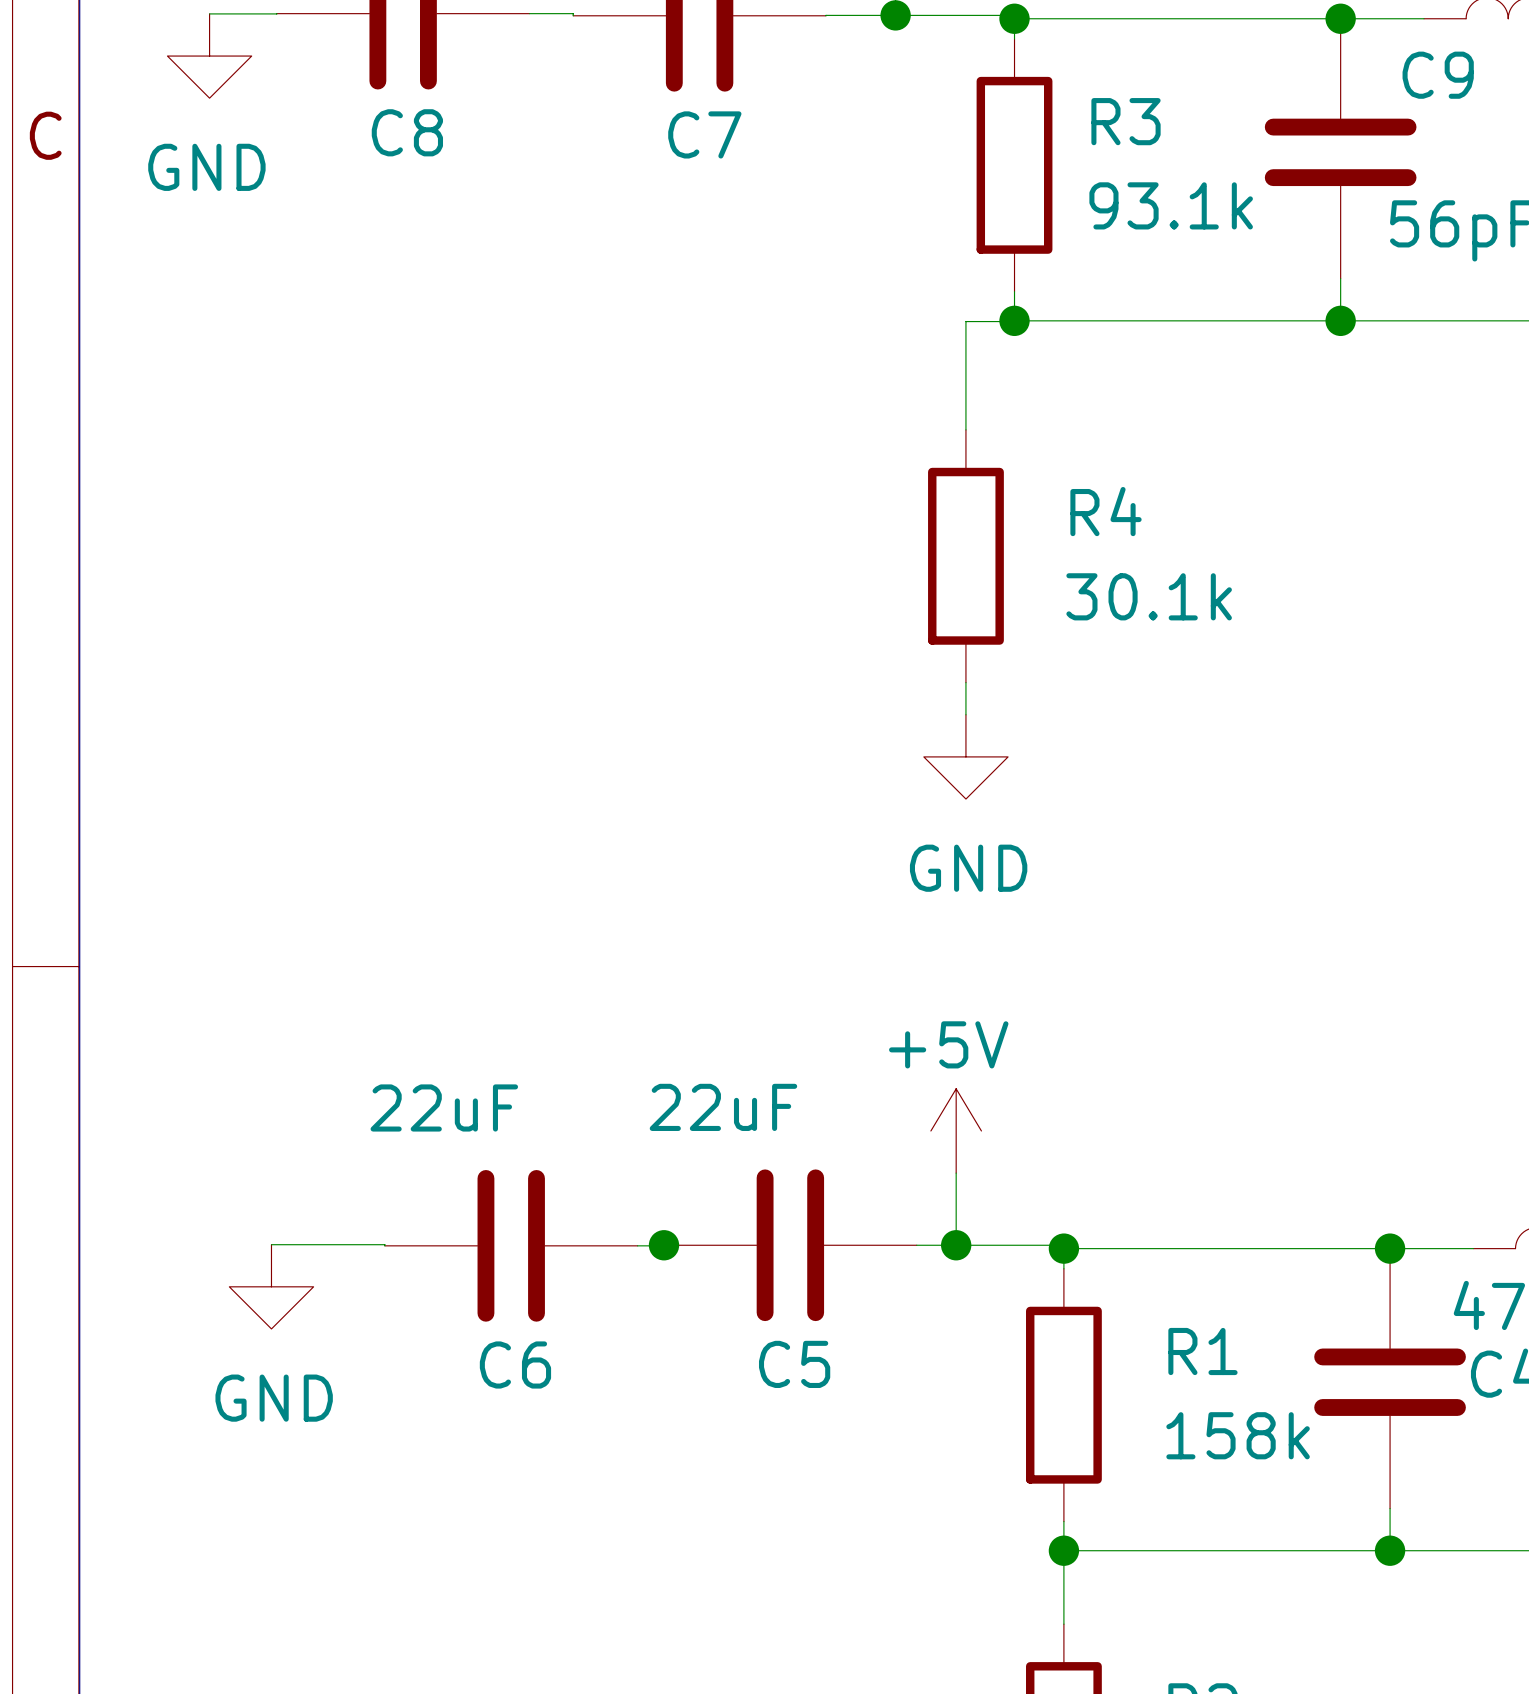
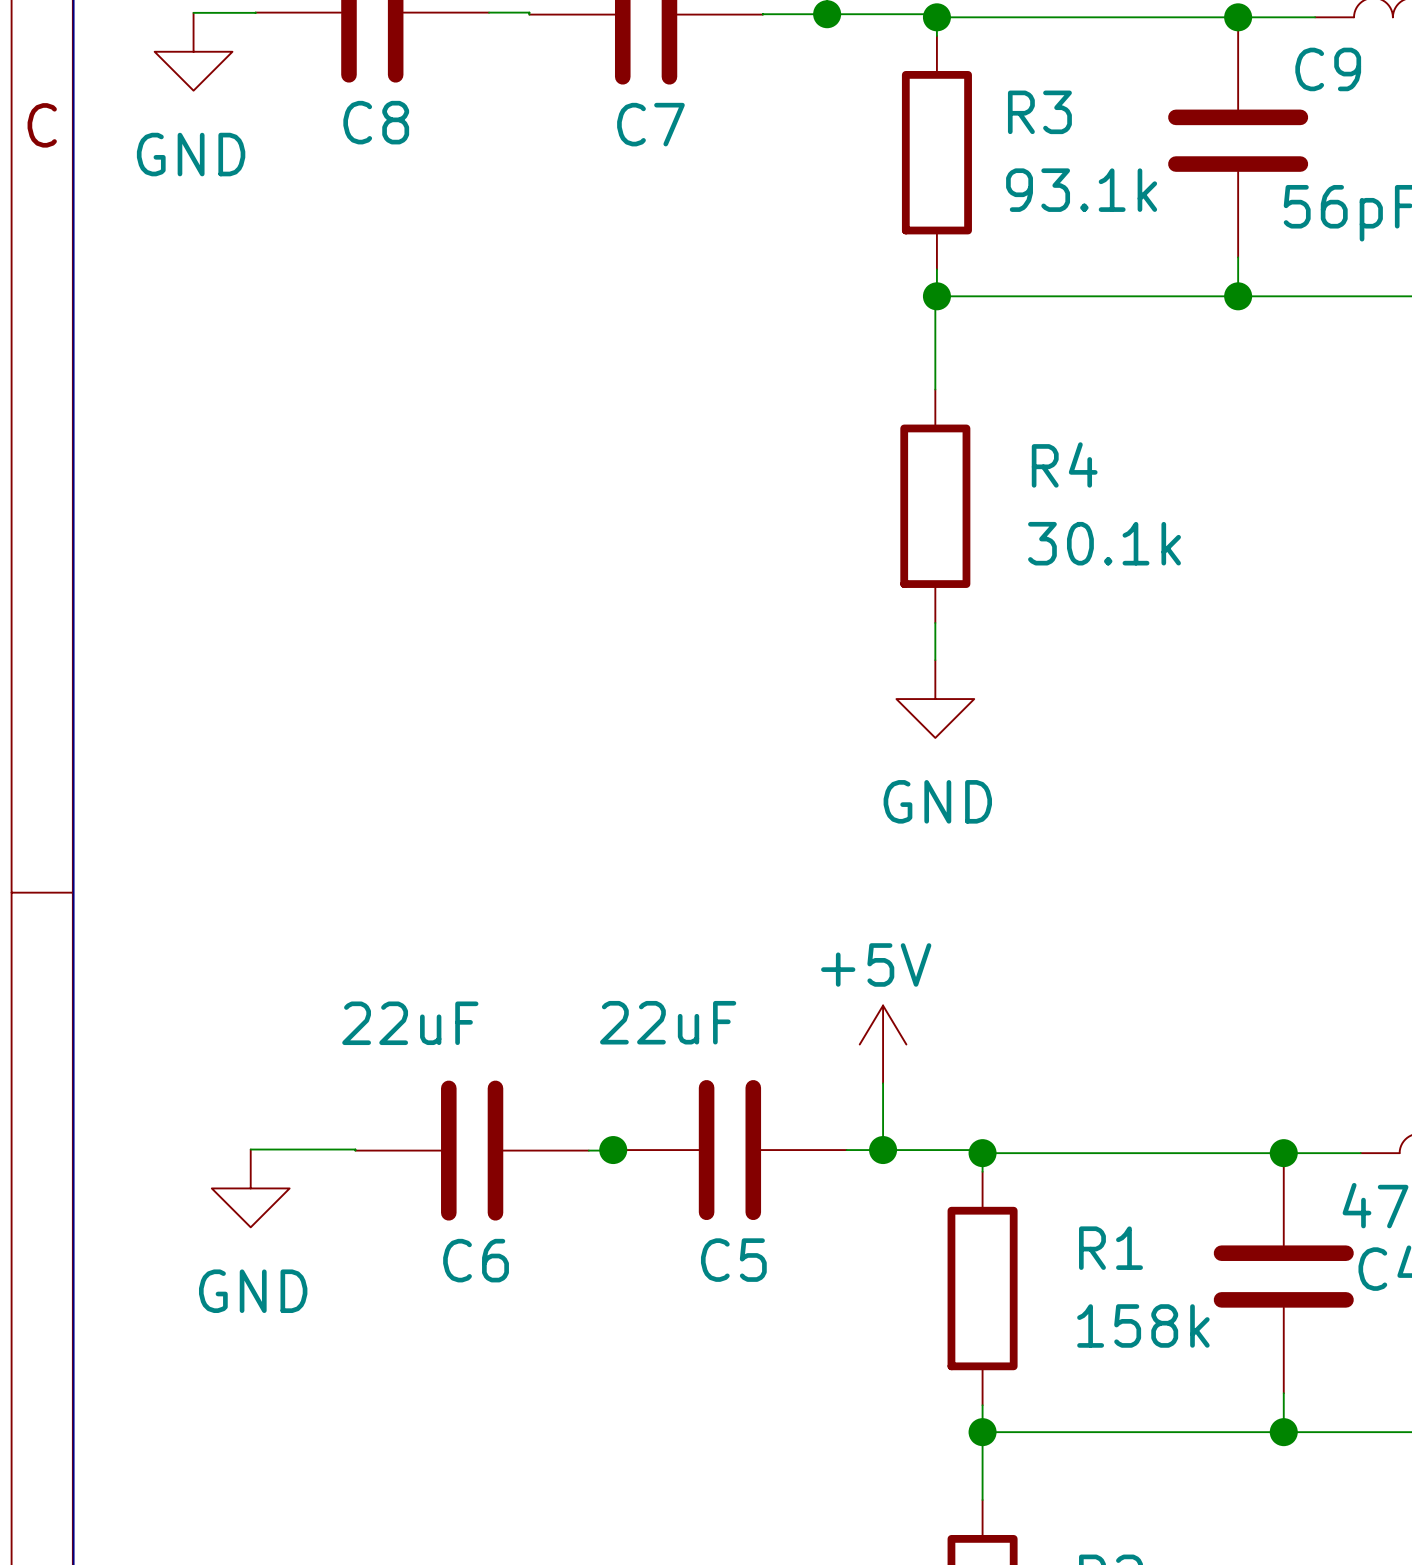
wire: (1012, 321) (965, 321) (965, 429) -> (935, 296) (935, 389)
R4 position: (965, 556) -> (935, 506)
wire: none -> (935, 622) (935, 660)
wire: (965, 682) (965, 714) -> none
power symbol position: GND (965, 756) -> GND (935, 699)

